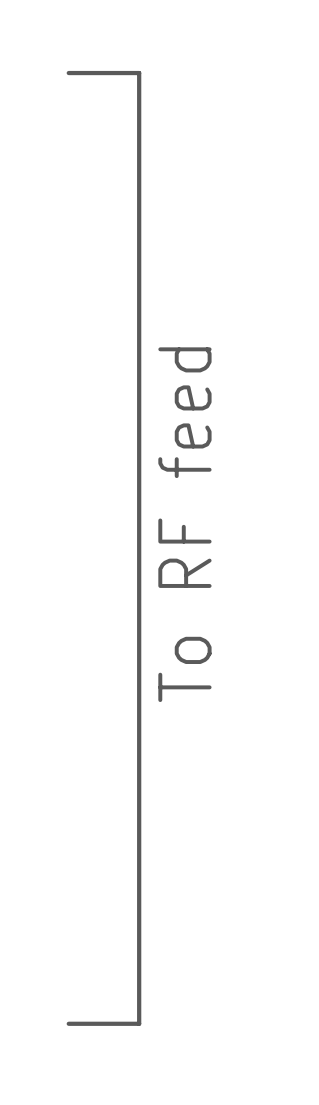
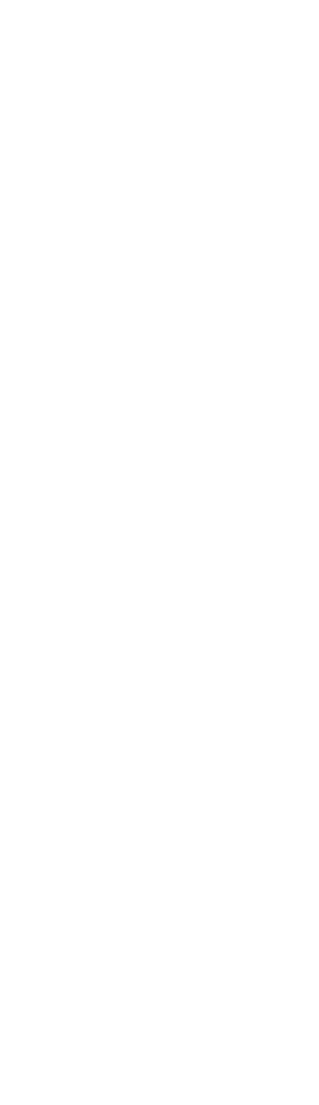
line: (68, 73) (139, 73) (139, 1023) (68, 1023) -> none
text: To RF feed (184, 524) -> none

